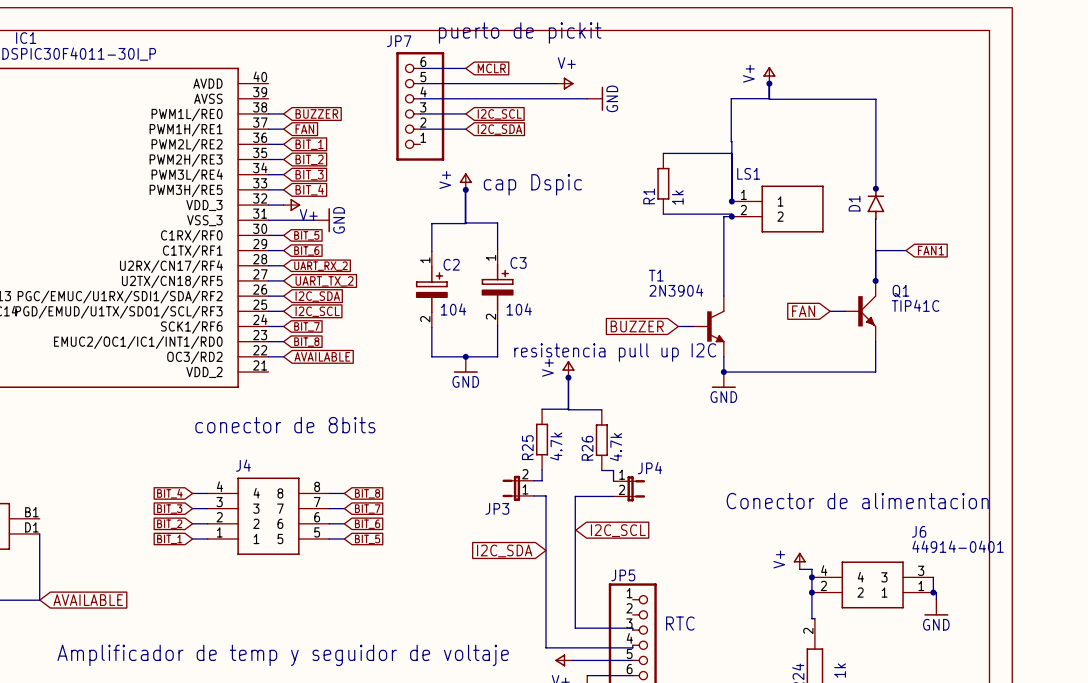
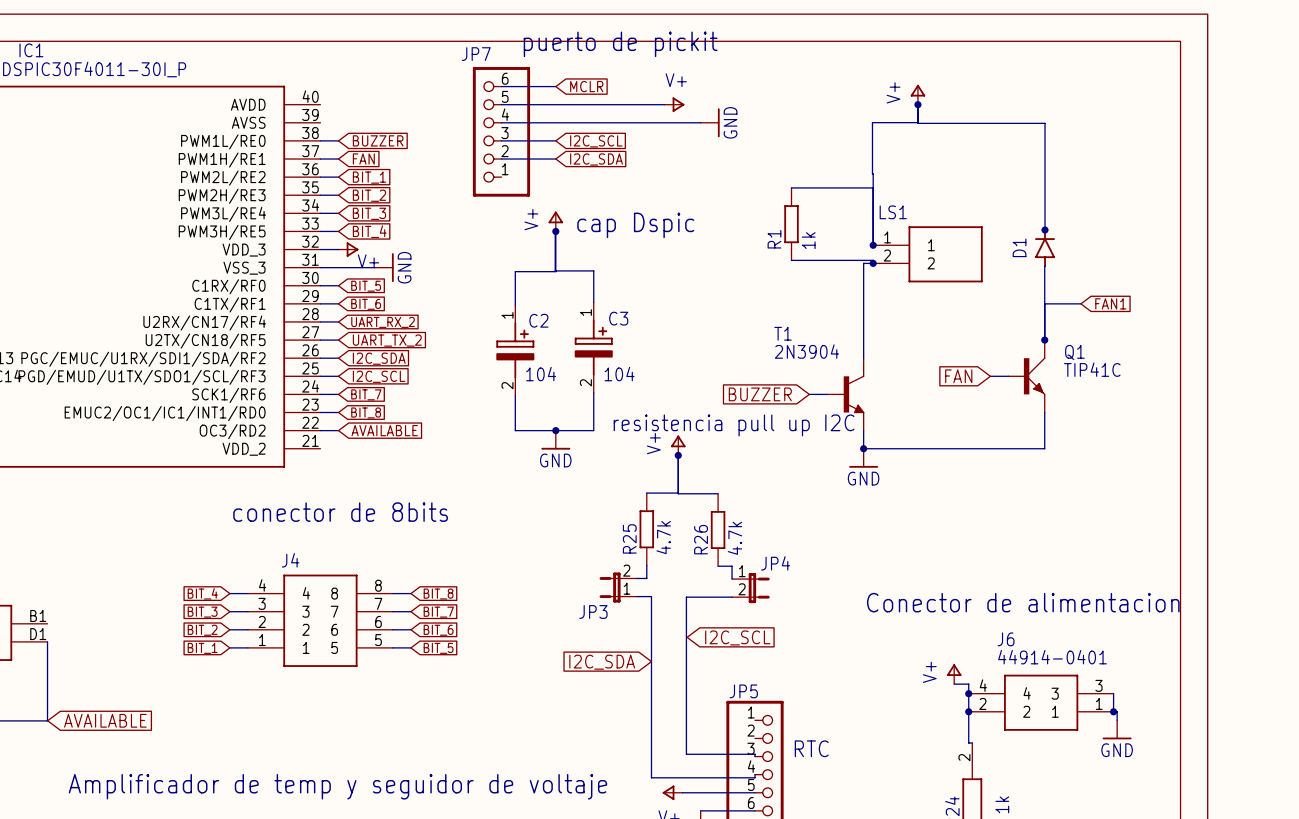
J6 name position: J6 (919, 531) -> J6 (1006, 639)
J6 value position: 44914-0401 (958, 546) -> 44914-0401 (1052, 657)

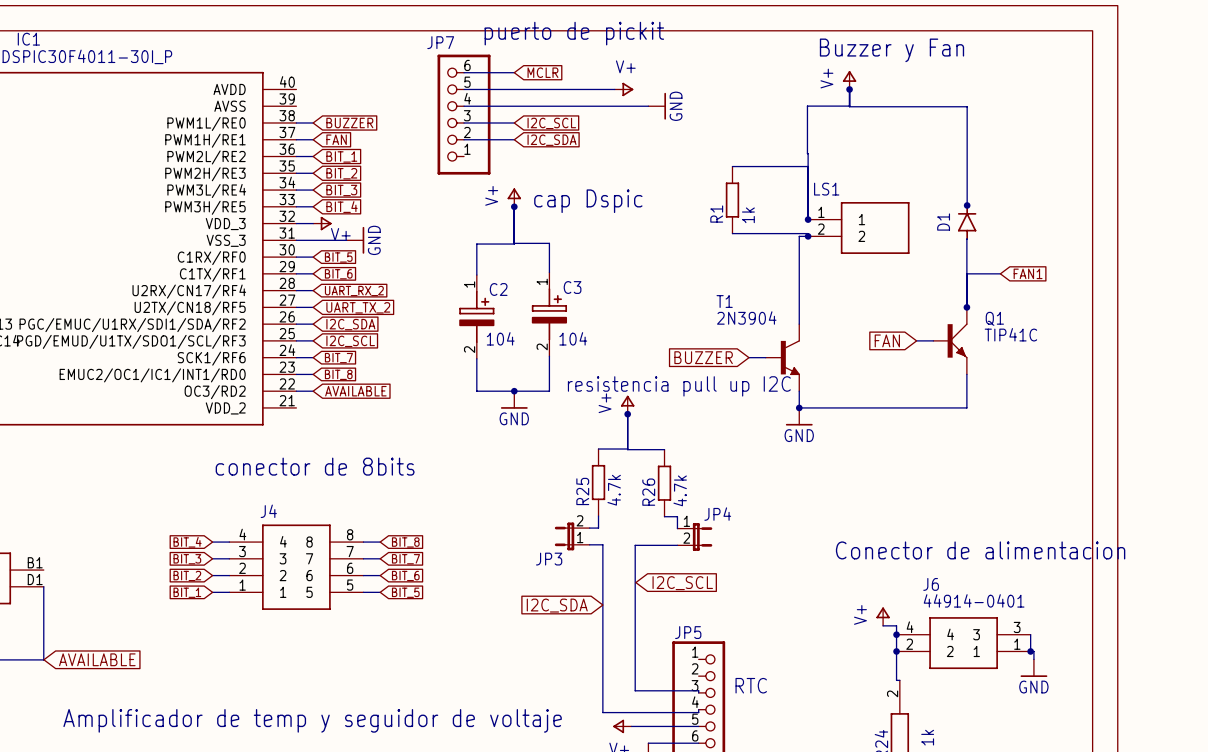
text: none -> Buzzer y Fan (891, 50)
text position: Conector de alimentacion (1023, 602) -> Conector de alimentacion (980, 550)

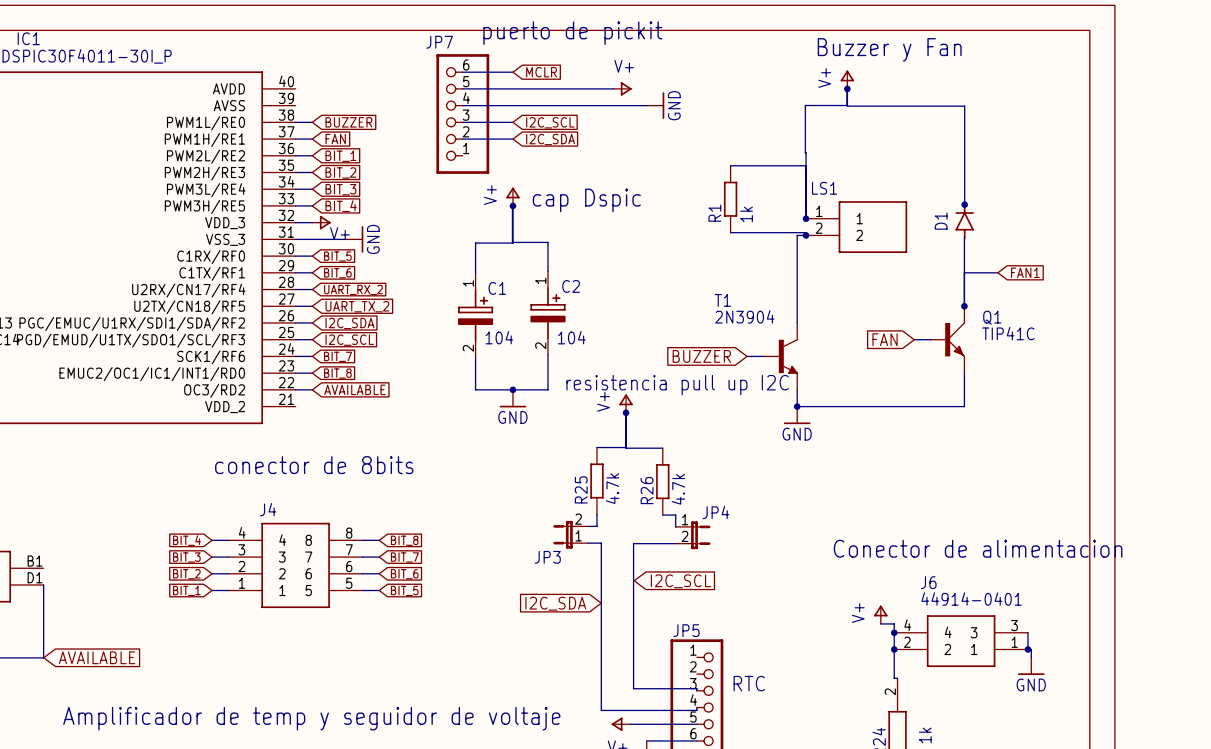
C3 name: C3 (572, 287) -> C2 (571, 286)
C2 name: C2 (498, 289) -> C1 (497, 288)

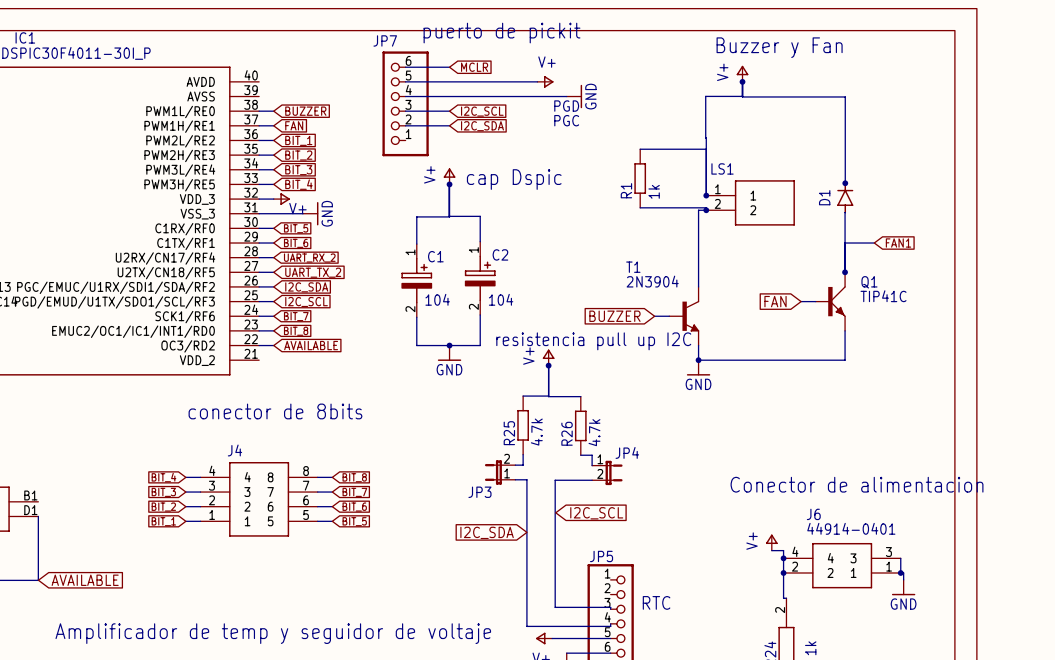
text: none -> PGD (566, 106)
text: none -> PGC (566, 120)

